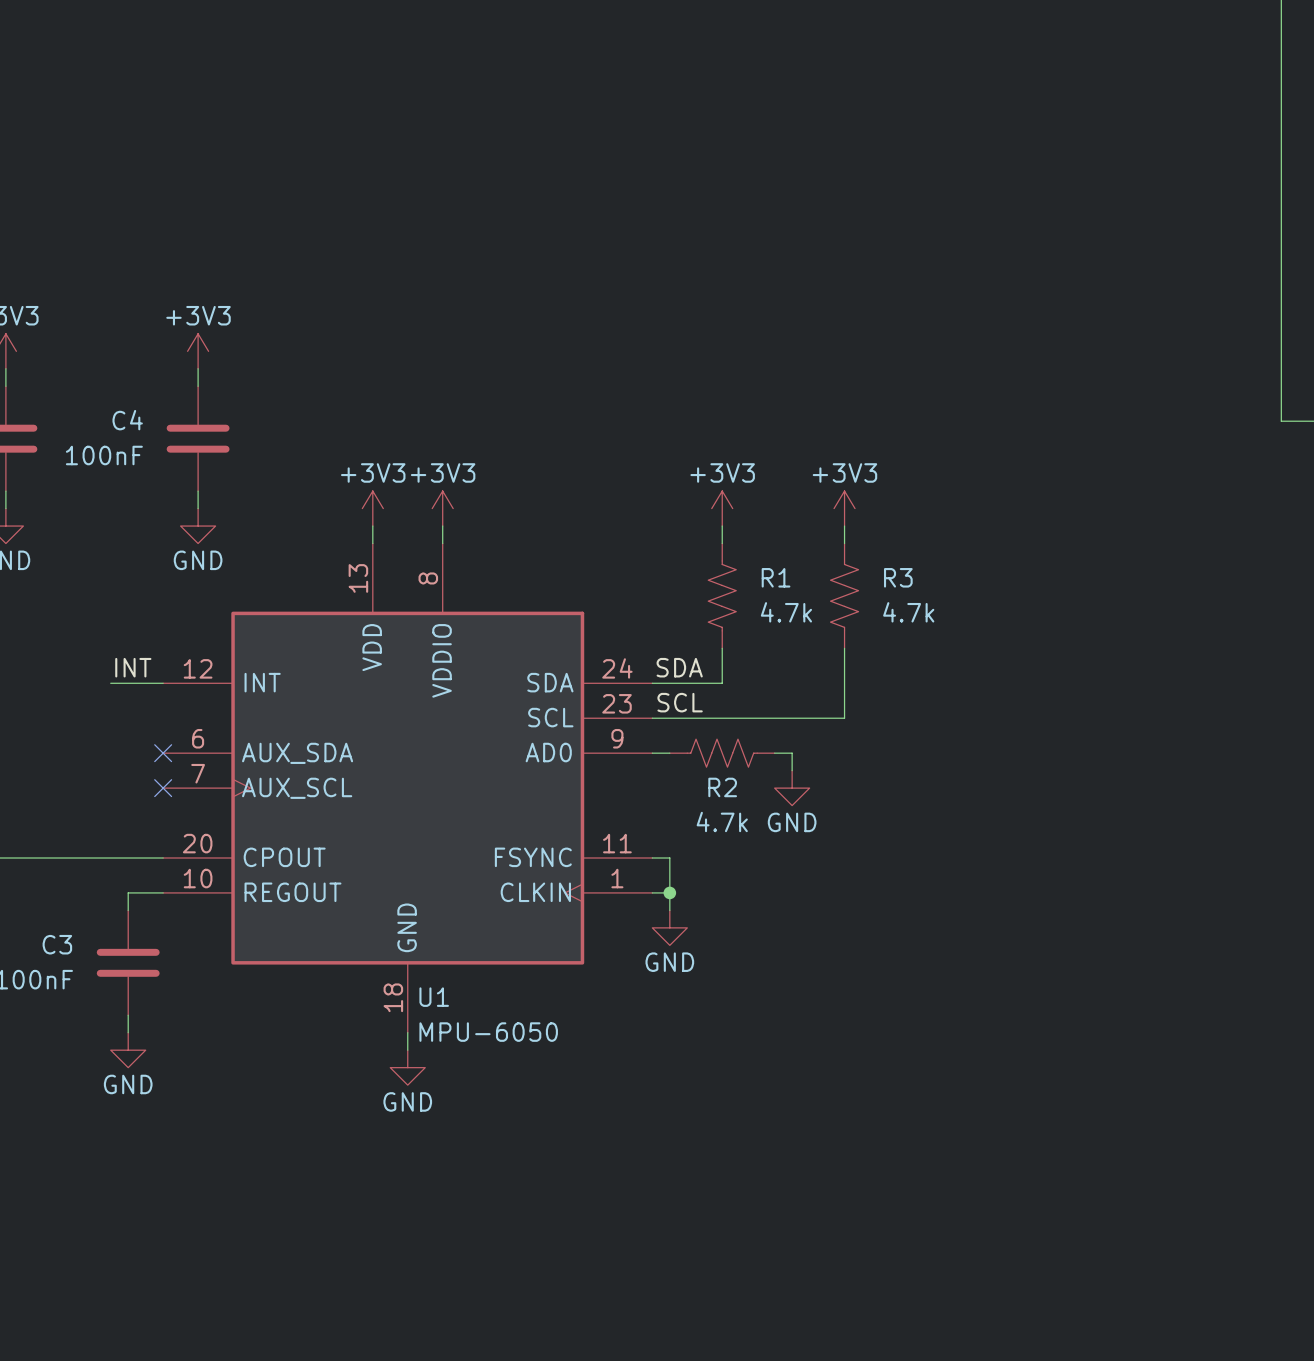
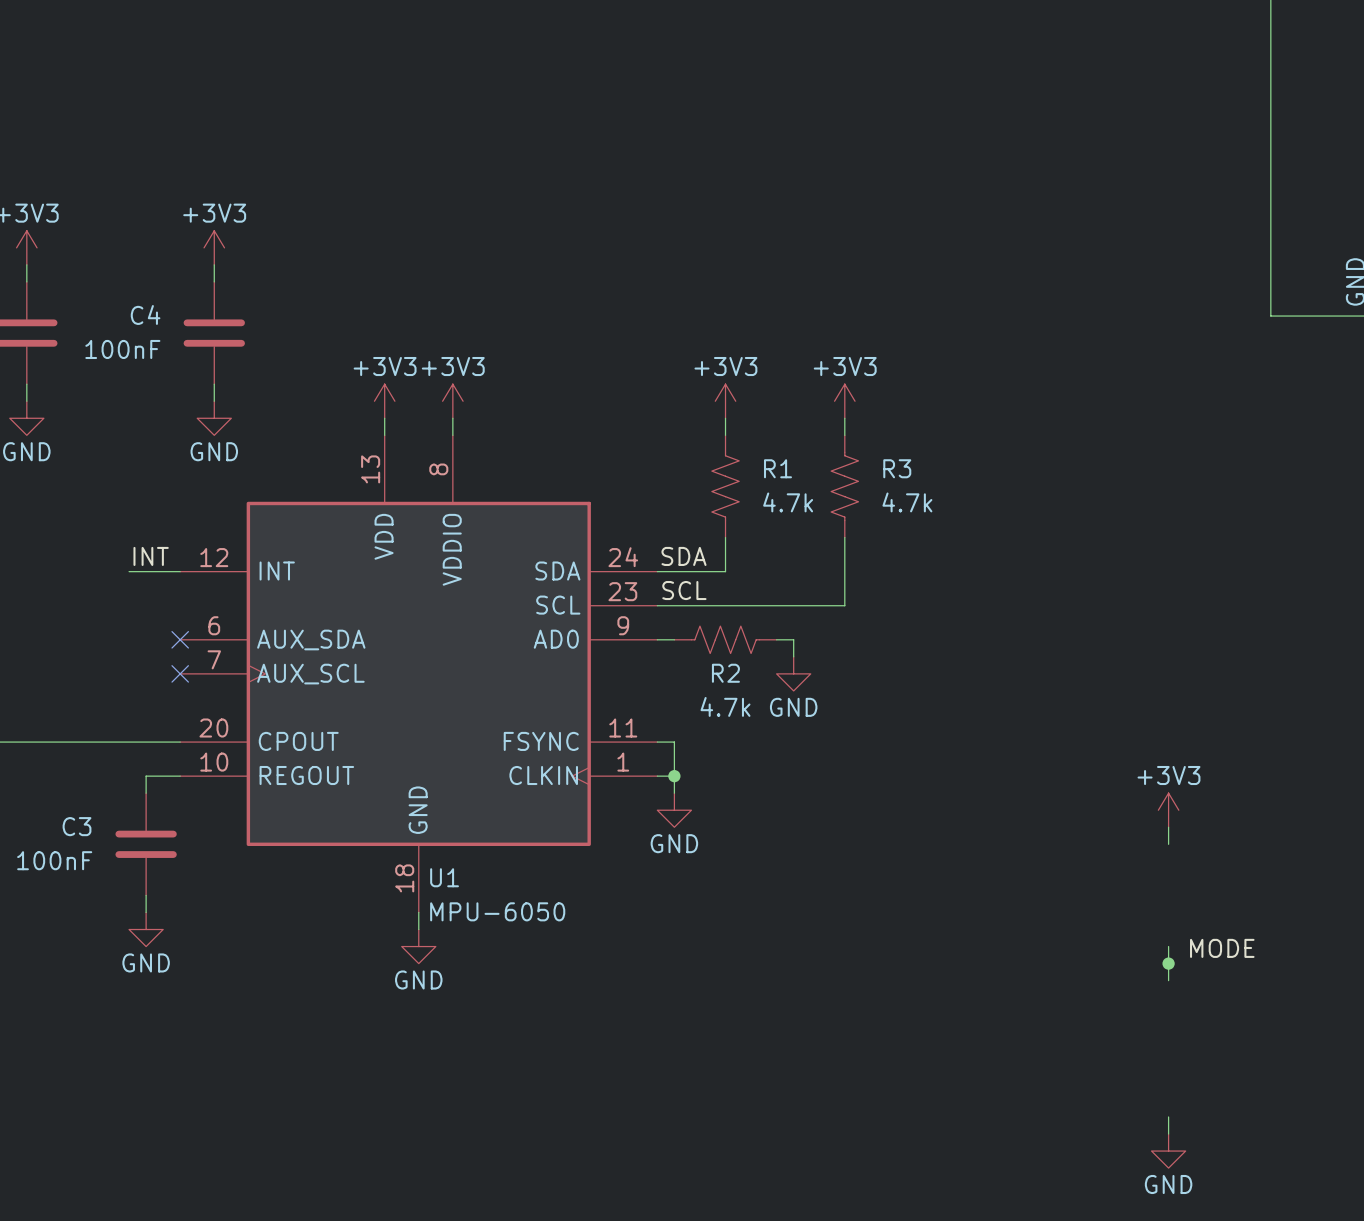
power symbol: none -> +3V3 (1168, 810)
wire: none -> (1168, 827) (1168, 844)
wire: none -> (1168, 946) (1168, 980)
label: none -> MODE (1222, 948)
junction: none -> (1168, 963)
wire: none -> (1168, 1116) (1168, 1134)
power symbol: none -> GND (1168, 1151)

